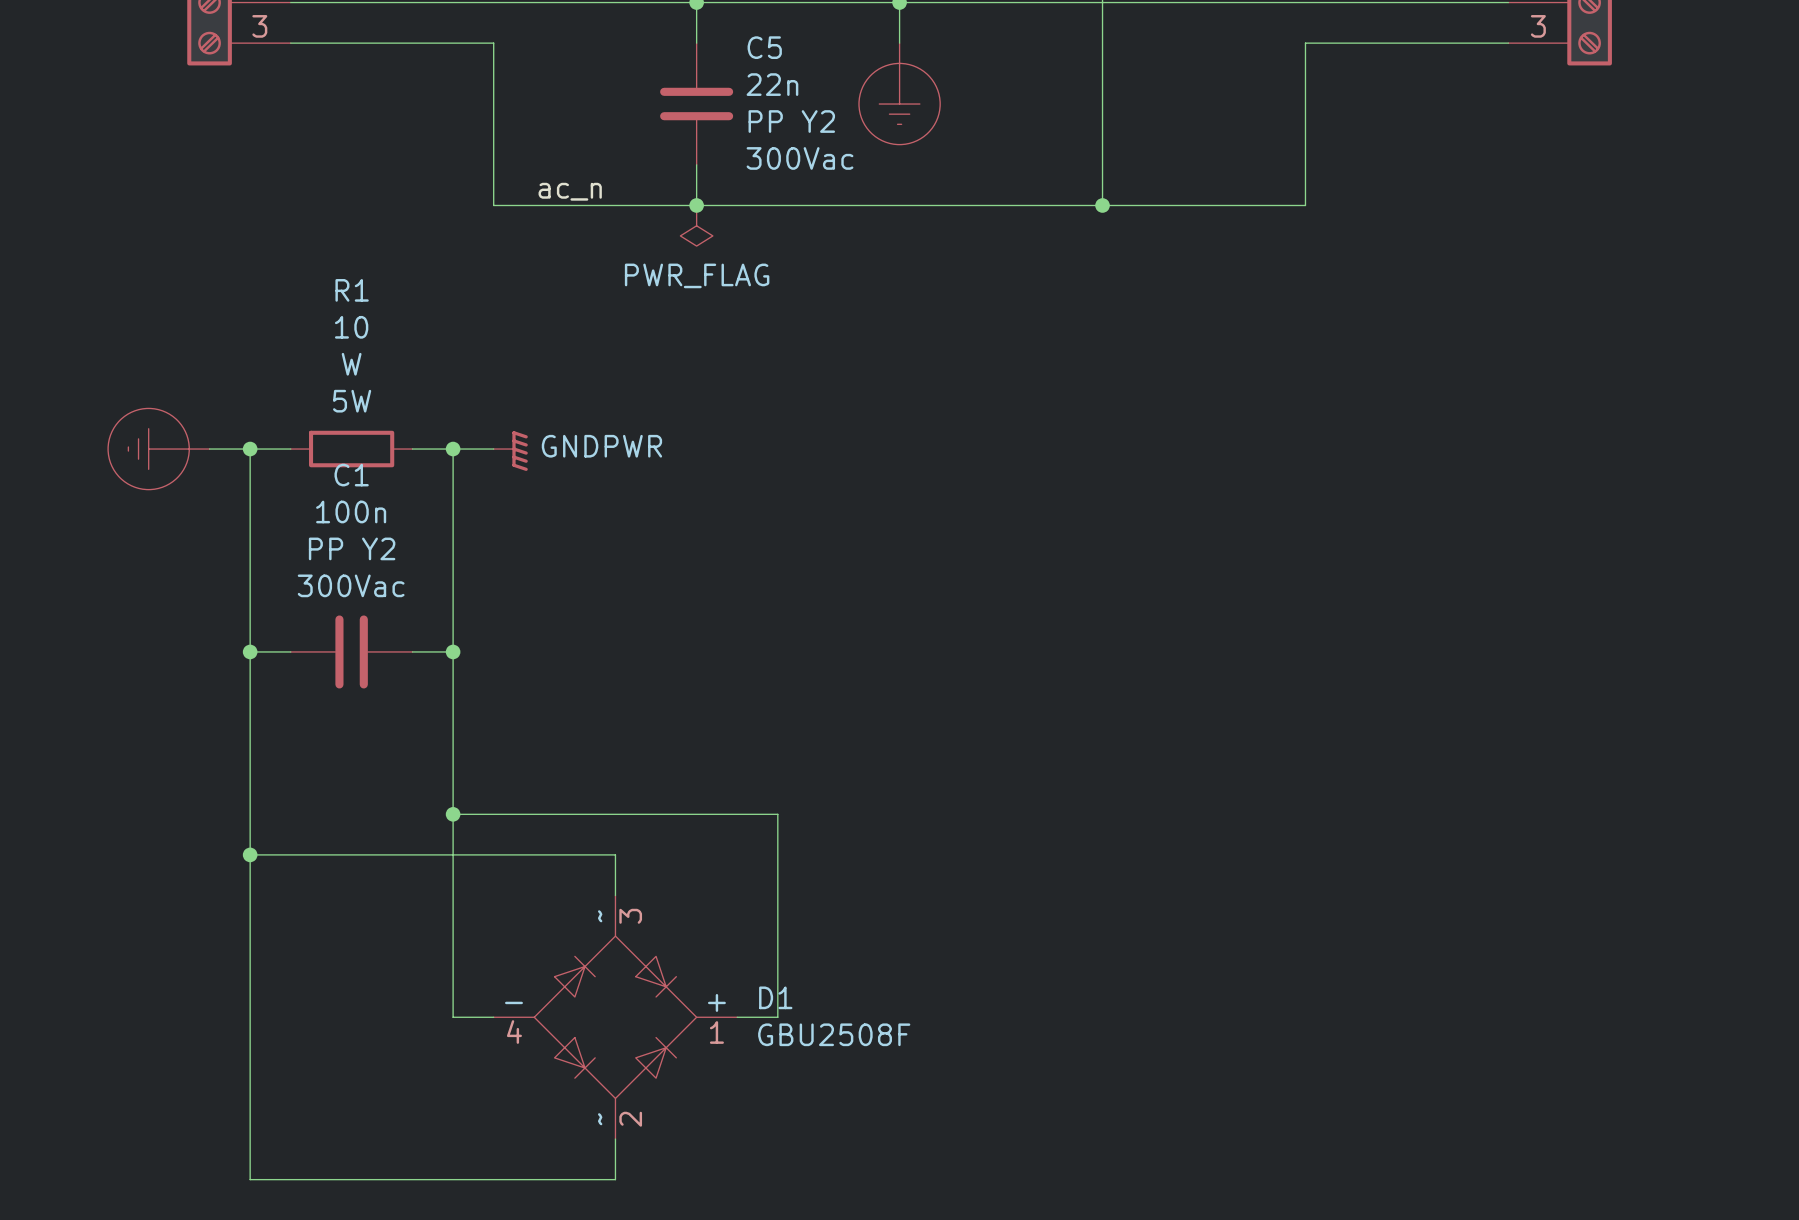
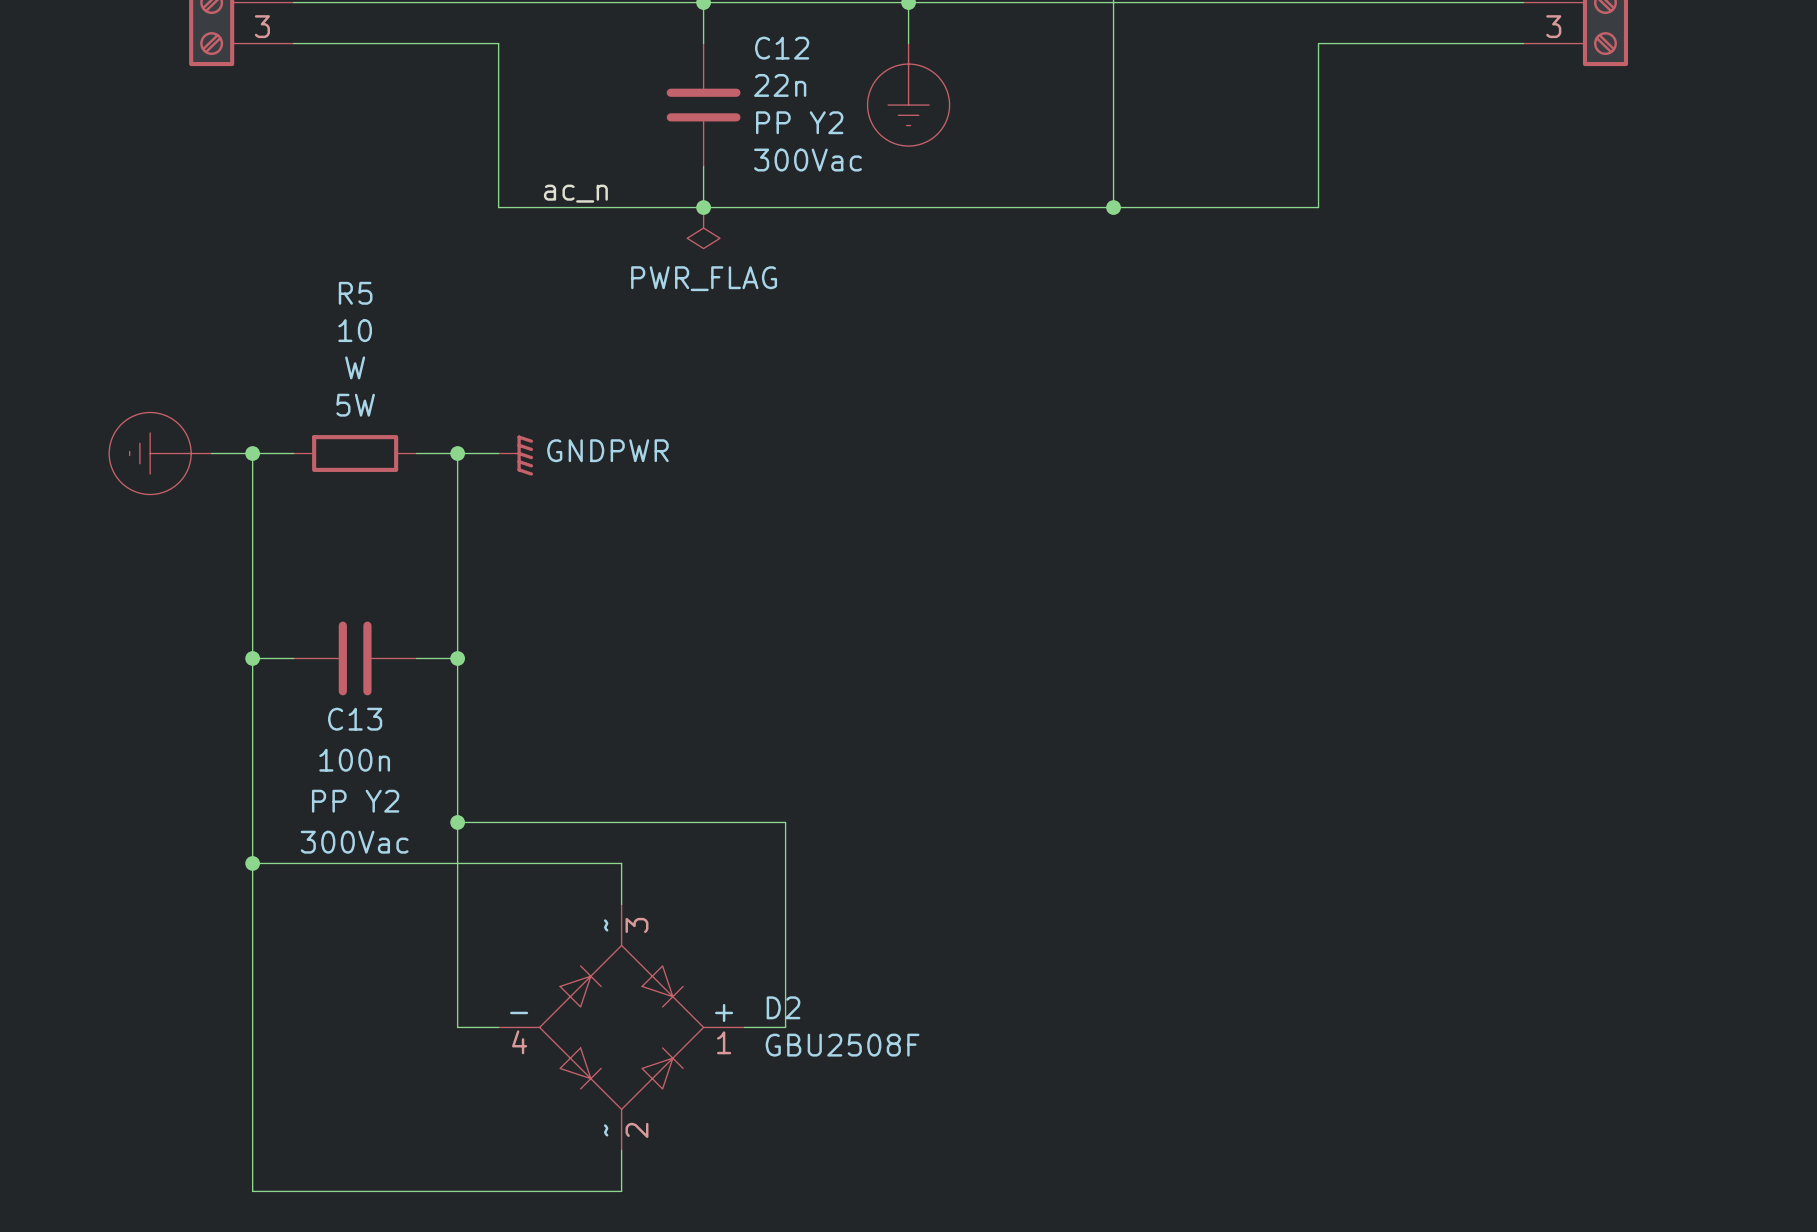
C5 name: C5 (764, 47) -> C12 (782, 48)
R1 name: R1 (352, 290) -> R5 (355, 293)
C1 name: C1 (351, 475) -> C13 (355, 719)
C1 value position: 100n (351, 511) -> 100n (354, 760)
C1 text position: PP Y2 (352, 548) -> PP Y2 (355, 801)
C1 text position: 300Vac (351, 585) -> 300Vac (354, 842)
D1 name: D1 (775, 997) -> D2 (783, 1007)

